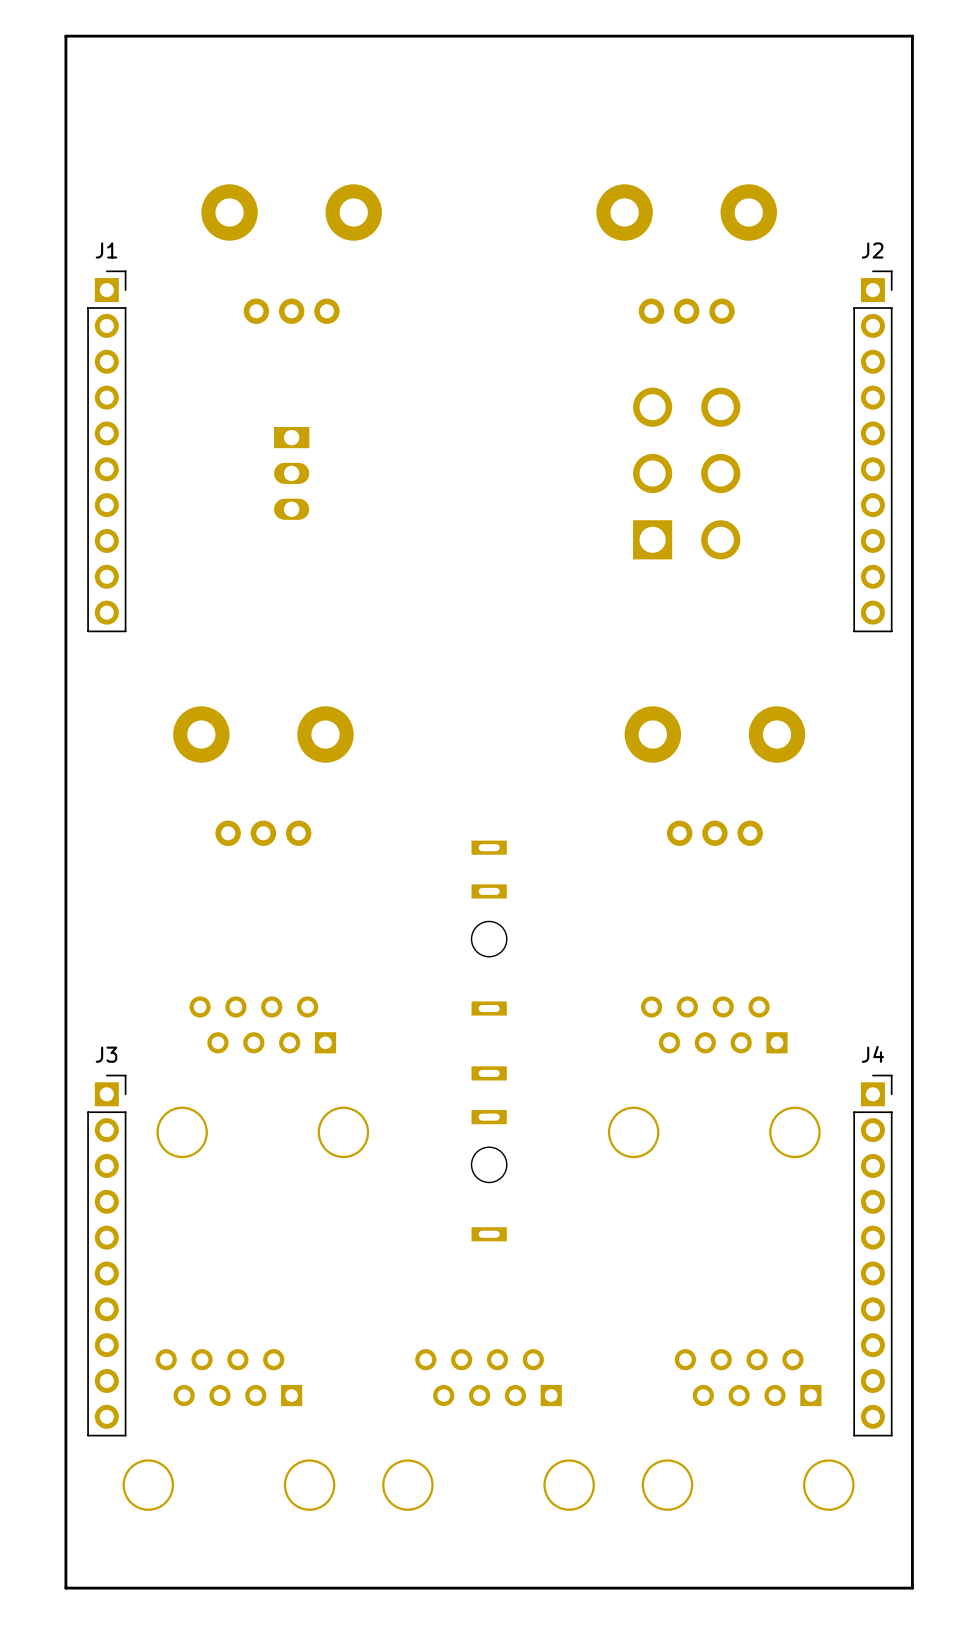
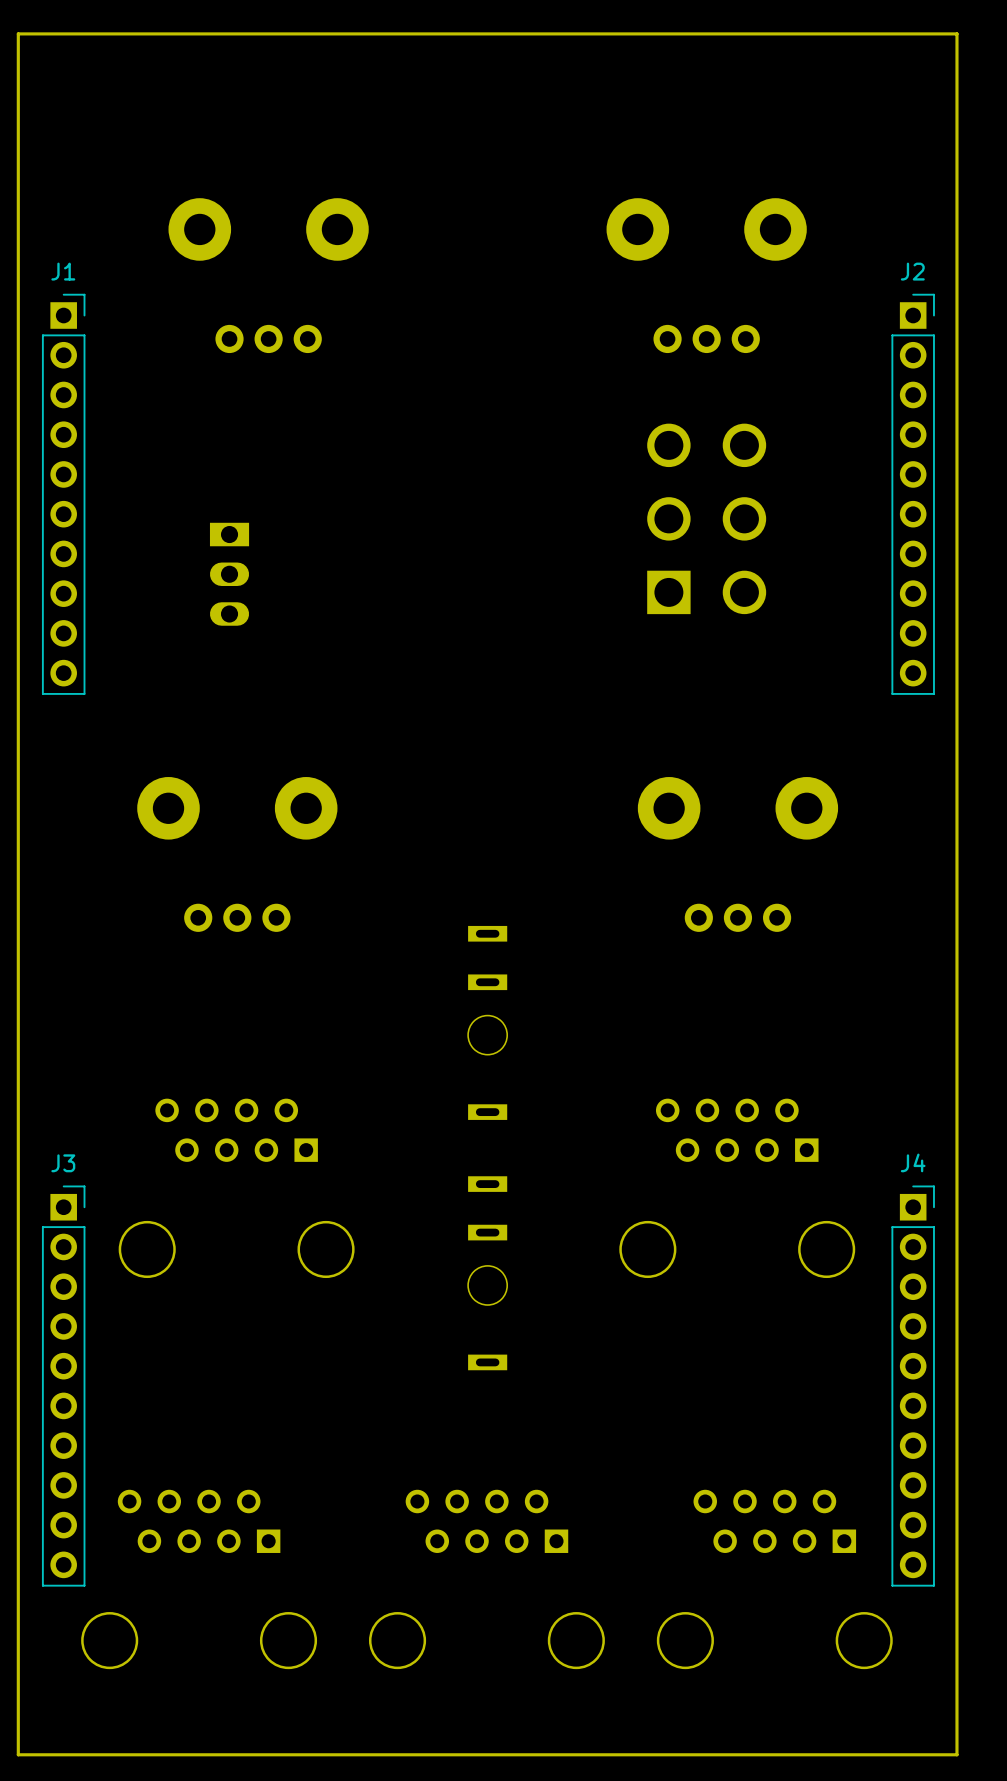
part position: (291, 473) -> (229, 574)

